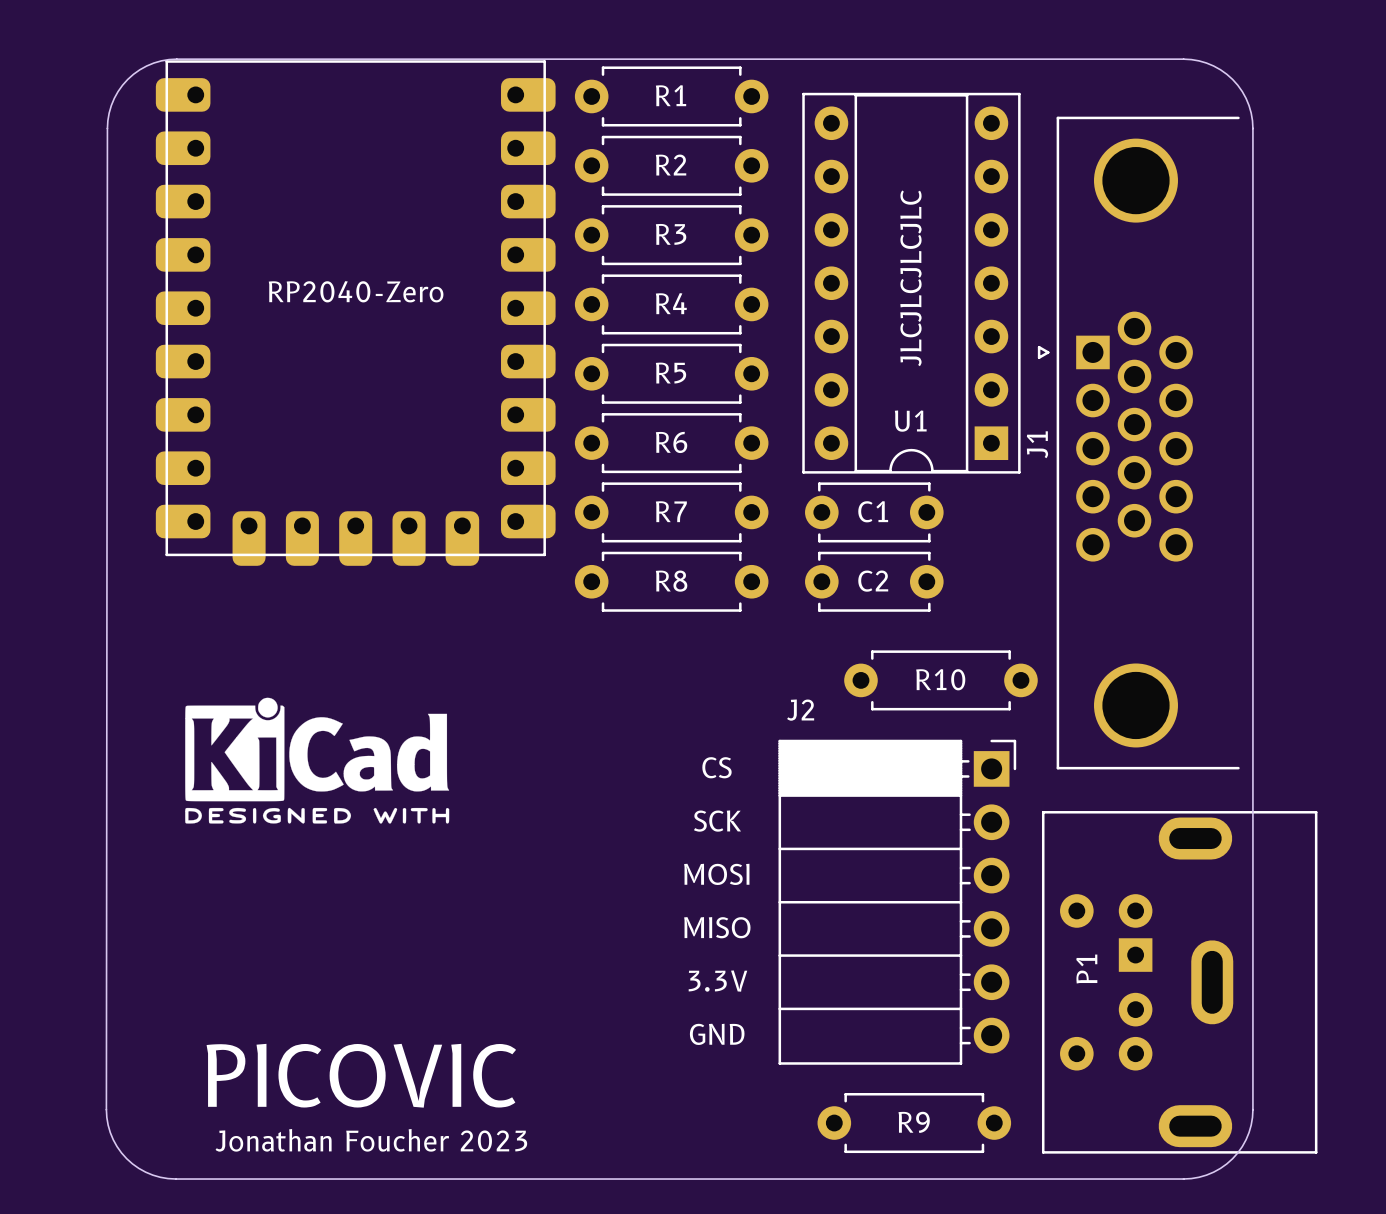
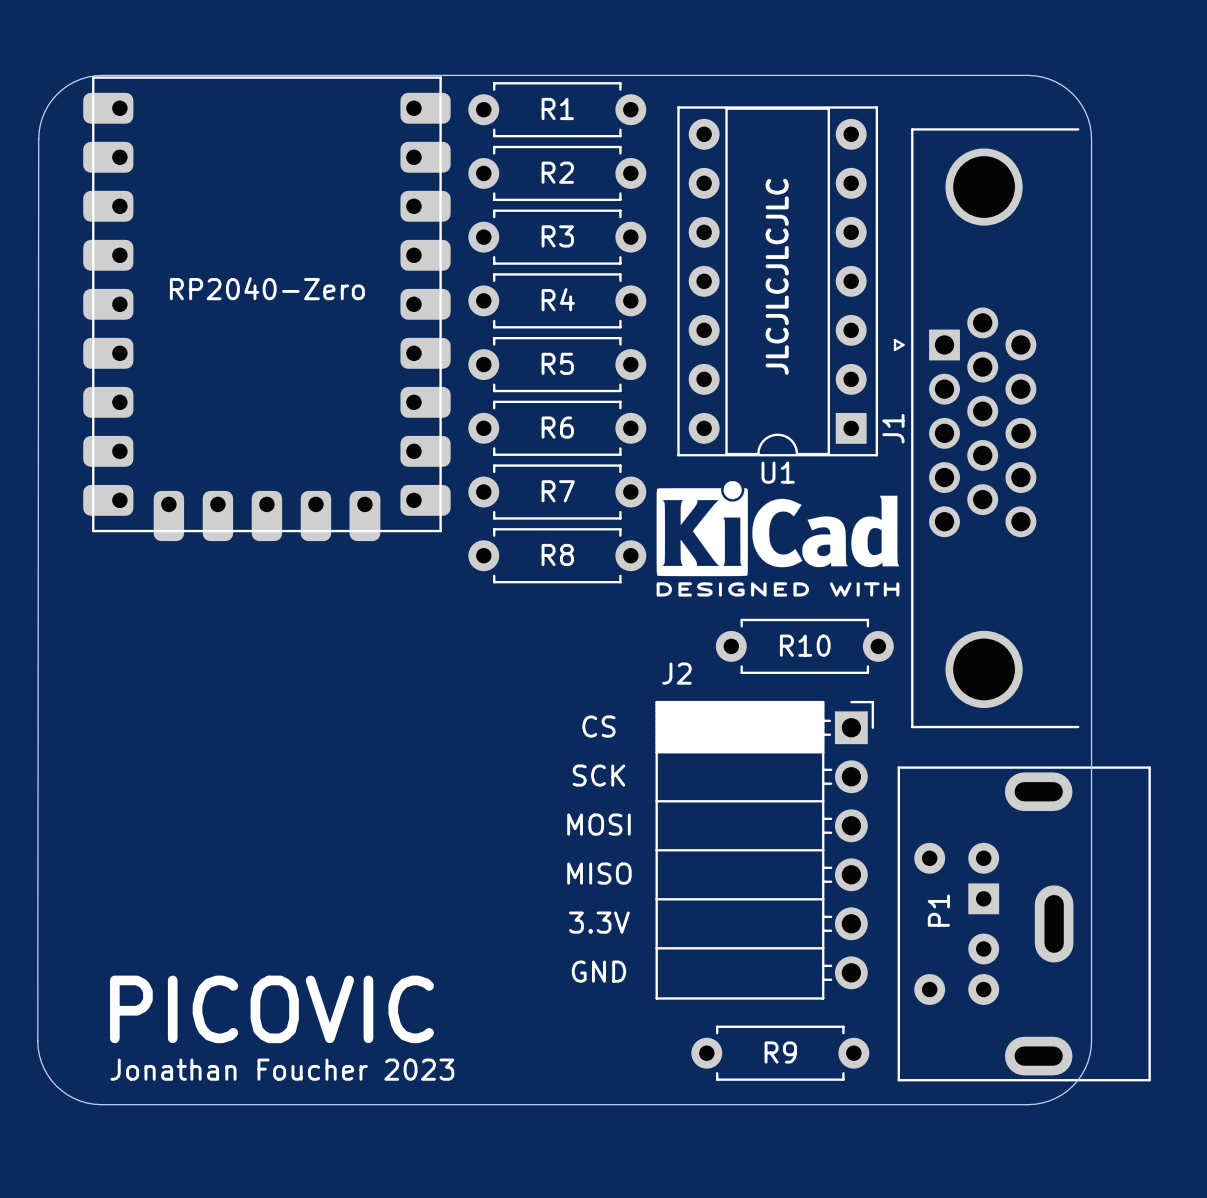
U1 name position: U1 (910, 421) -> U1 (778, 472)
drawing: none -> [656, 481, 900, 597]
C1: (874, 512) -> none
C2: (874, 581) -> none
drawing: [185, 697, 450, 824] -> none

